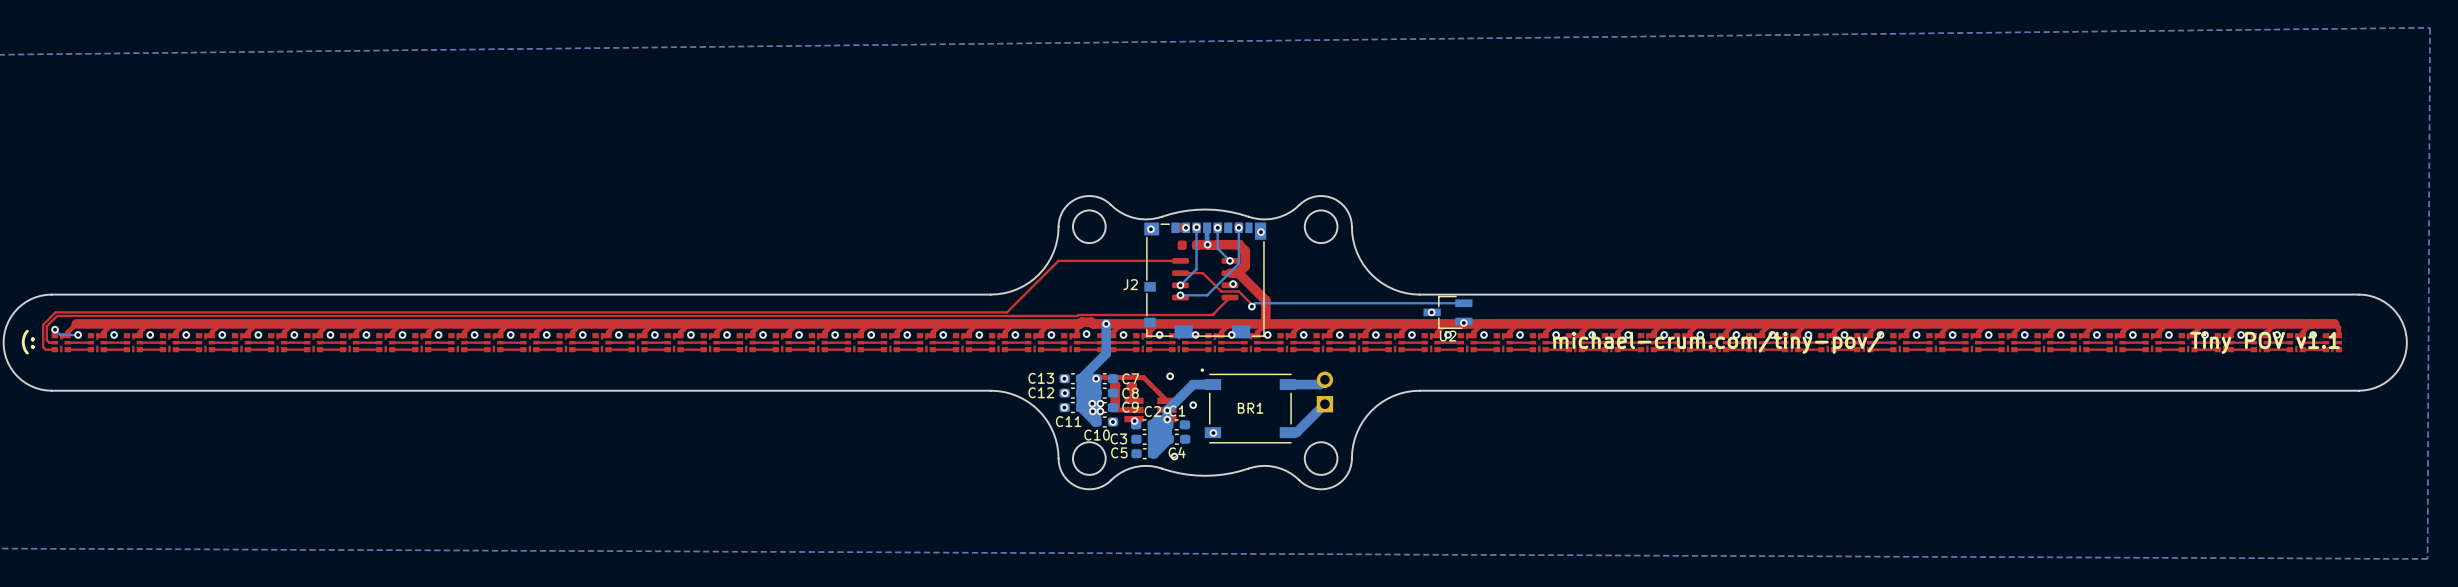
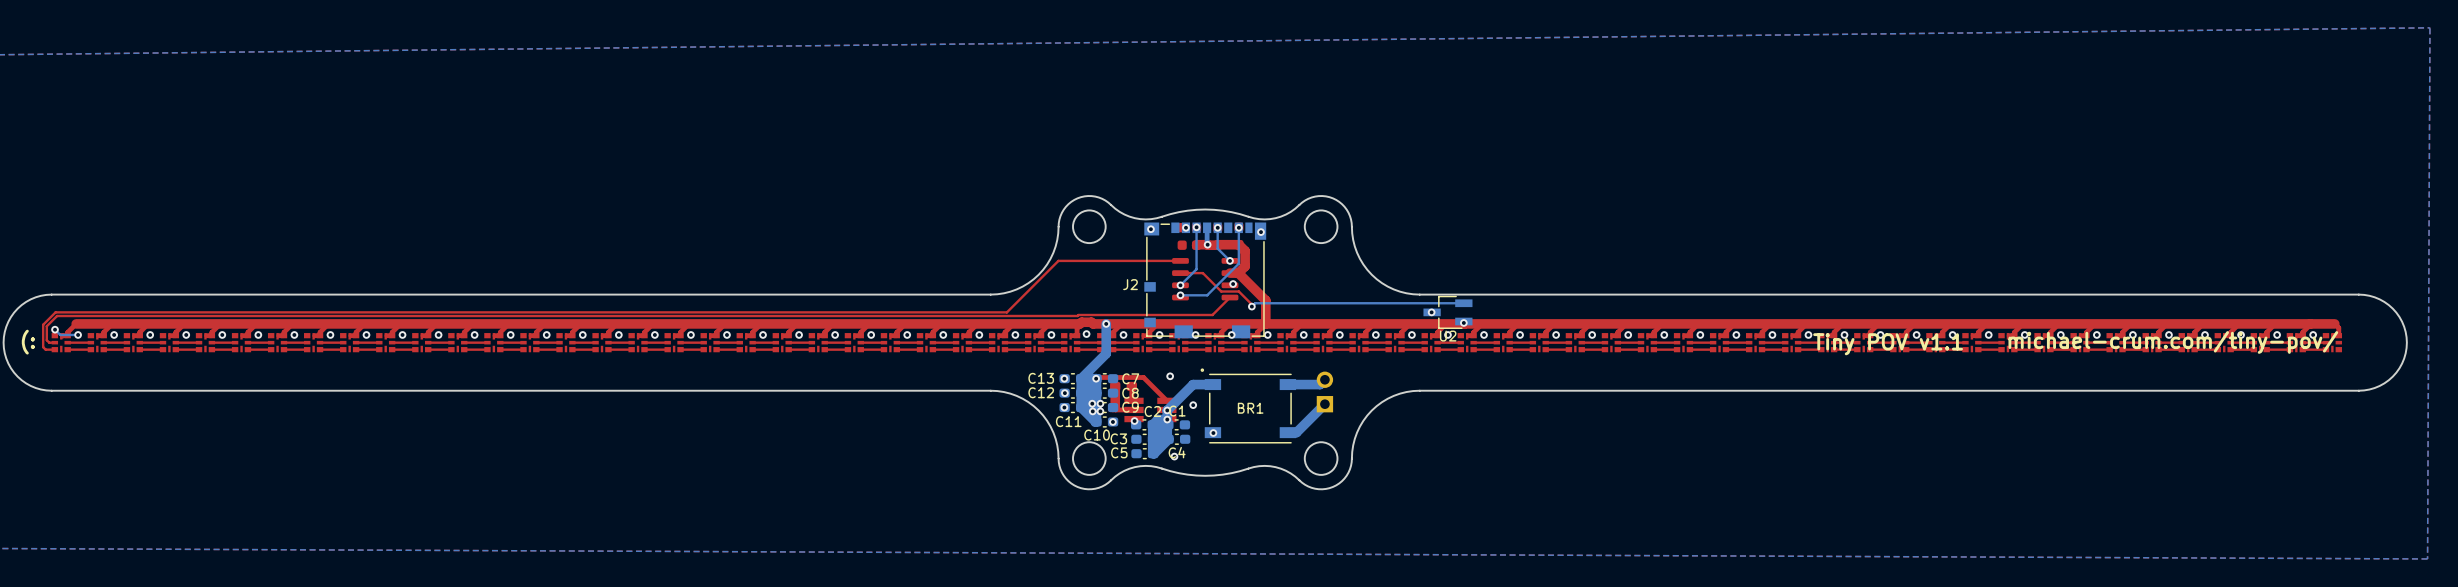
text: michael-crum.com/tiny-pov/ (1718, 342) -> none
text: none -> michael-crum.com/tiny-pov/ (2173, 342)
text: Tiny POV v1.1 (2264, 342) -> none
text: none -> Tiny POV v1.1 (1888, 344)

